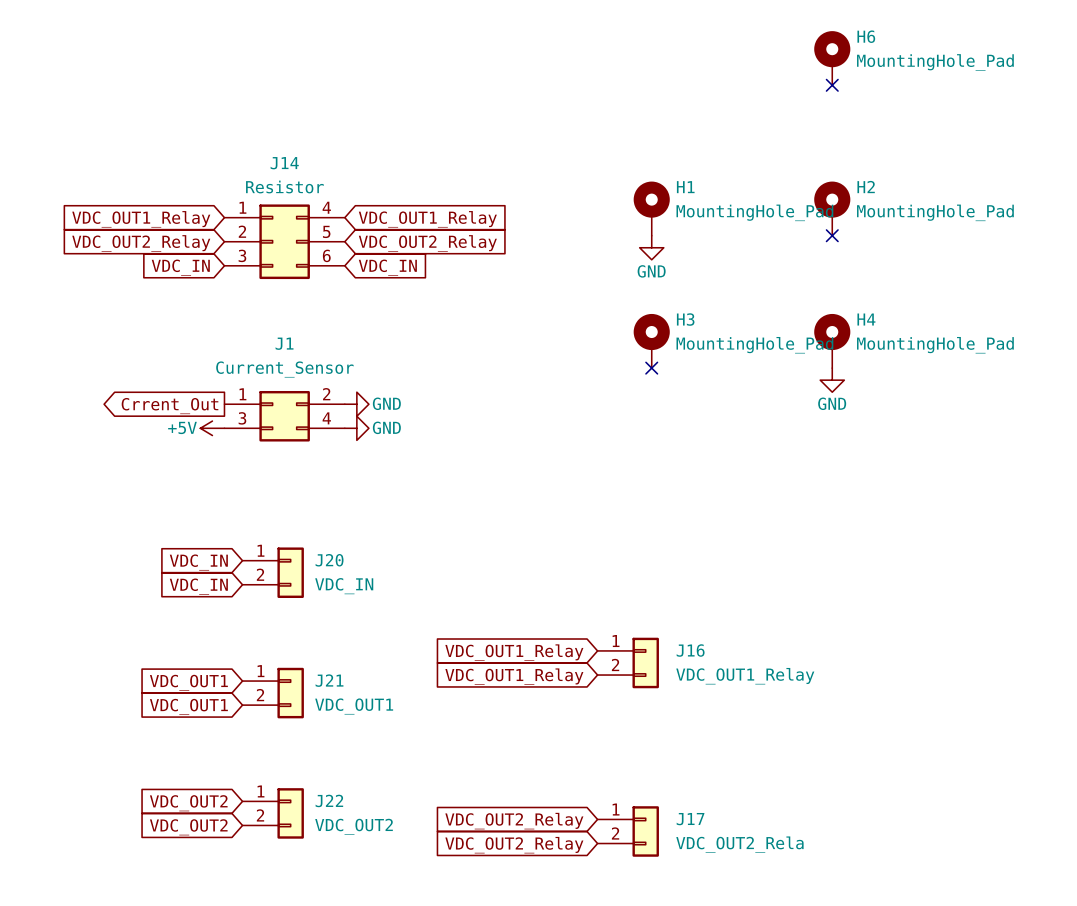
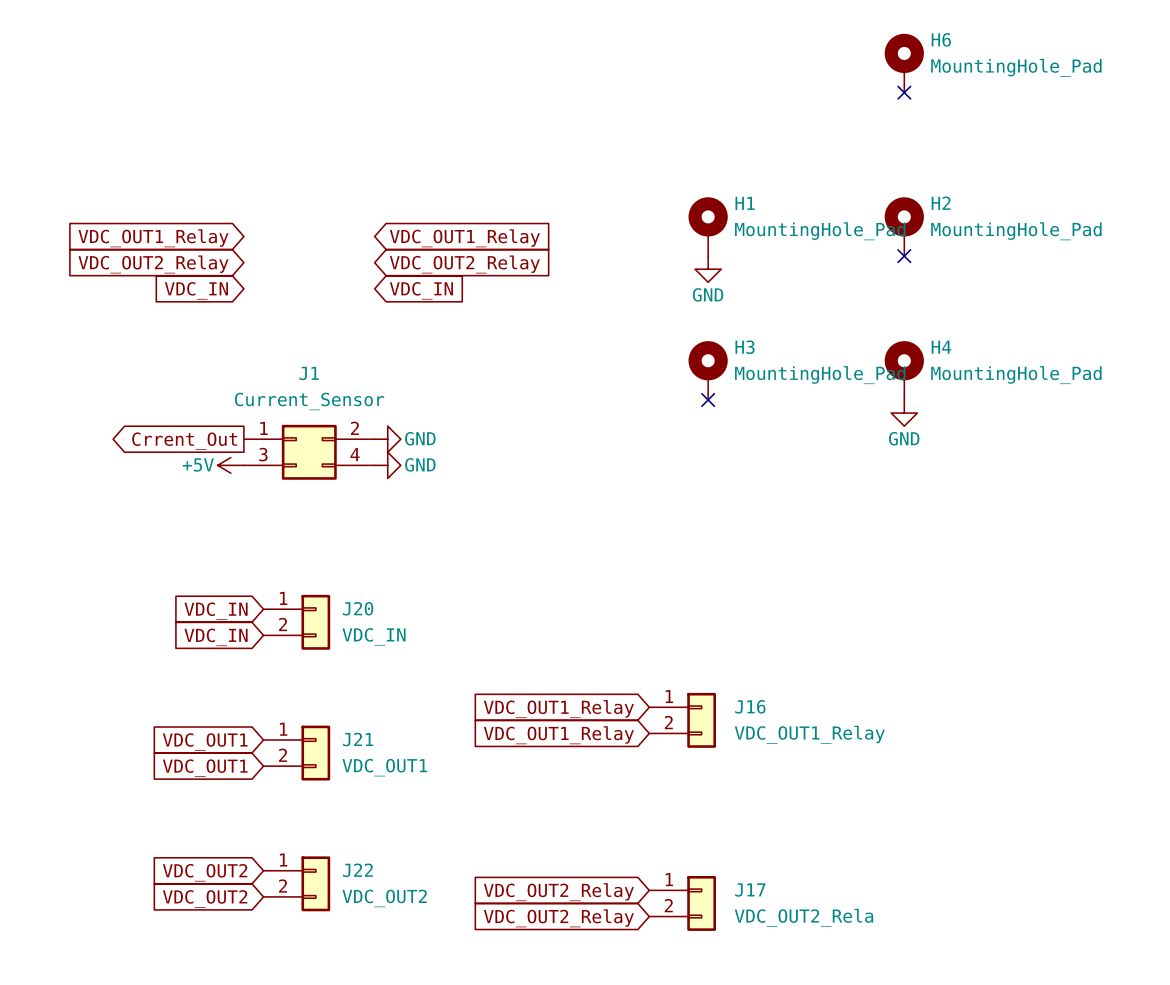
J14: Resistor (284, 241) -> none

